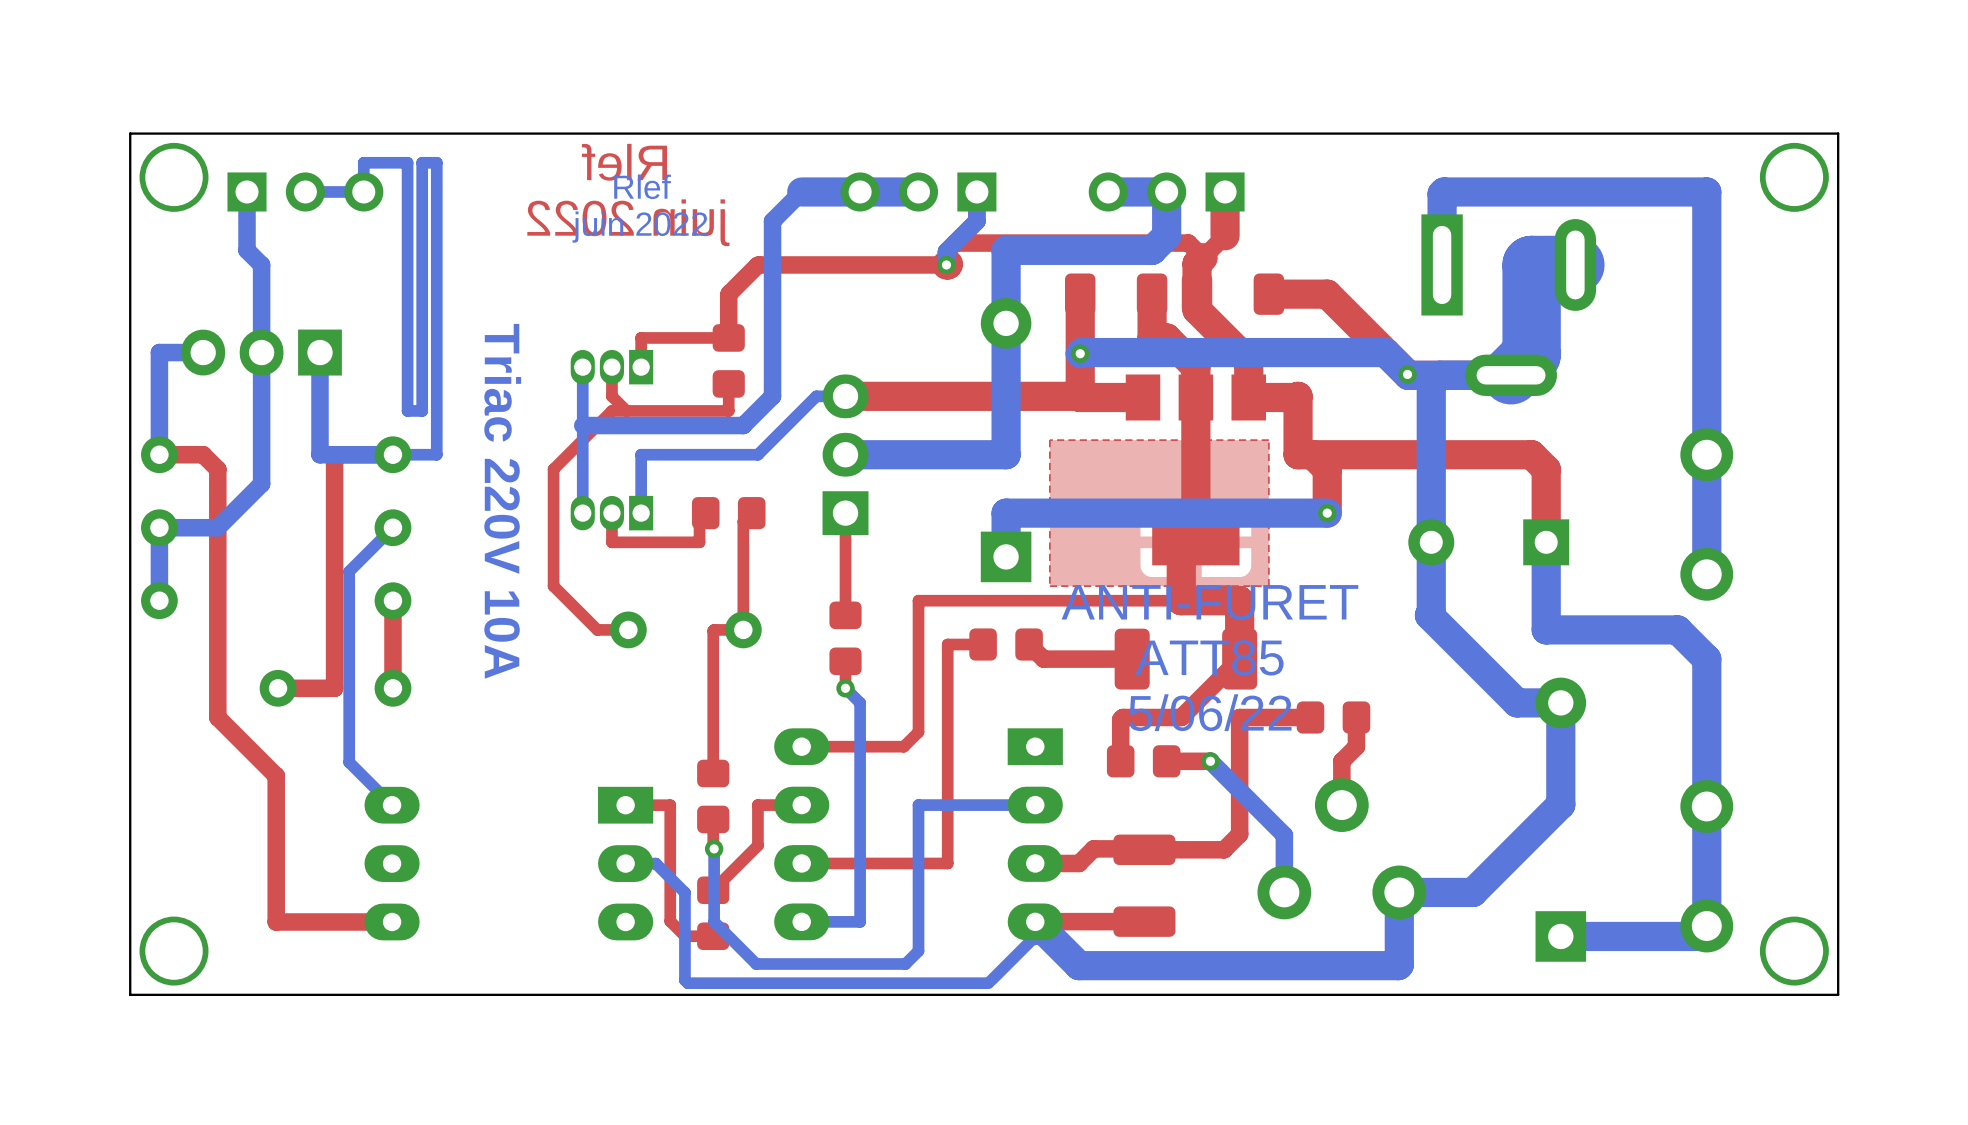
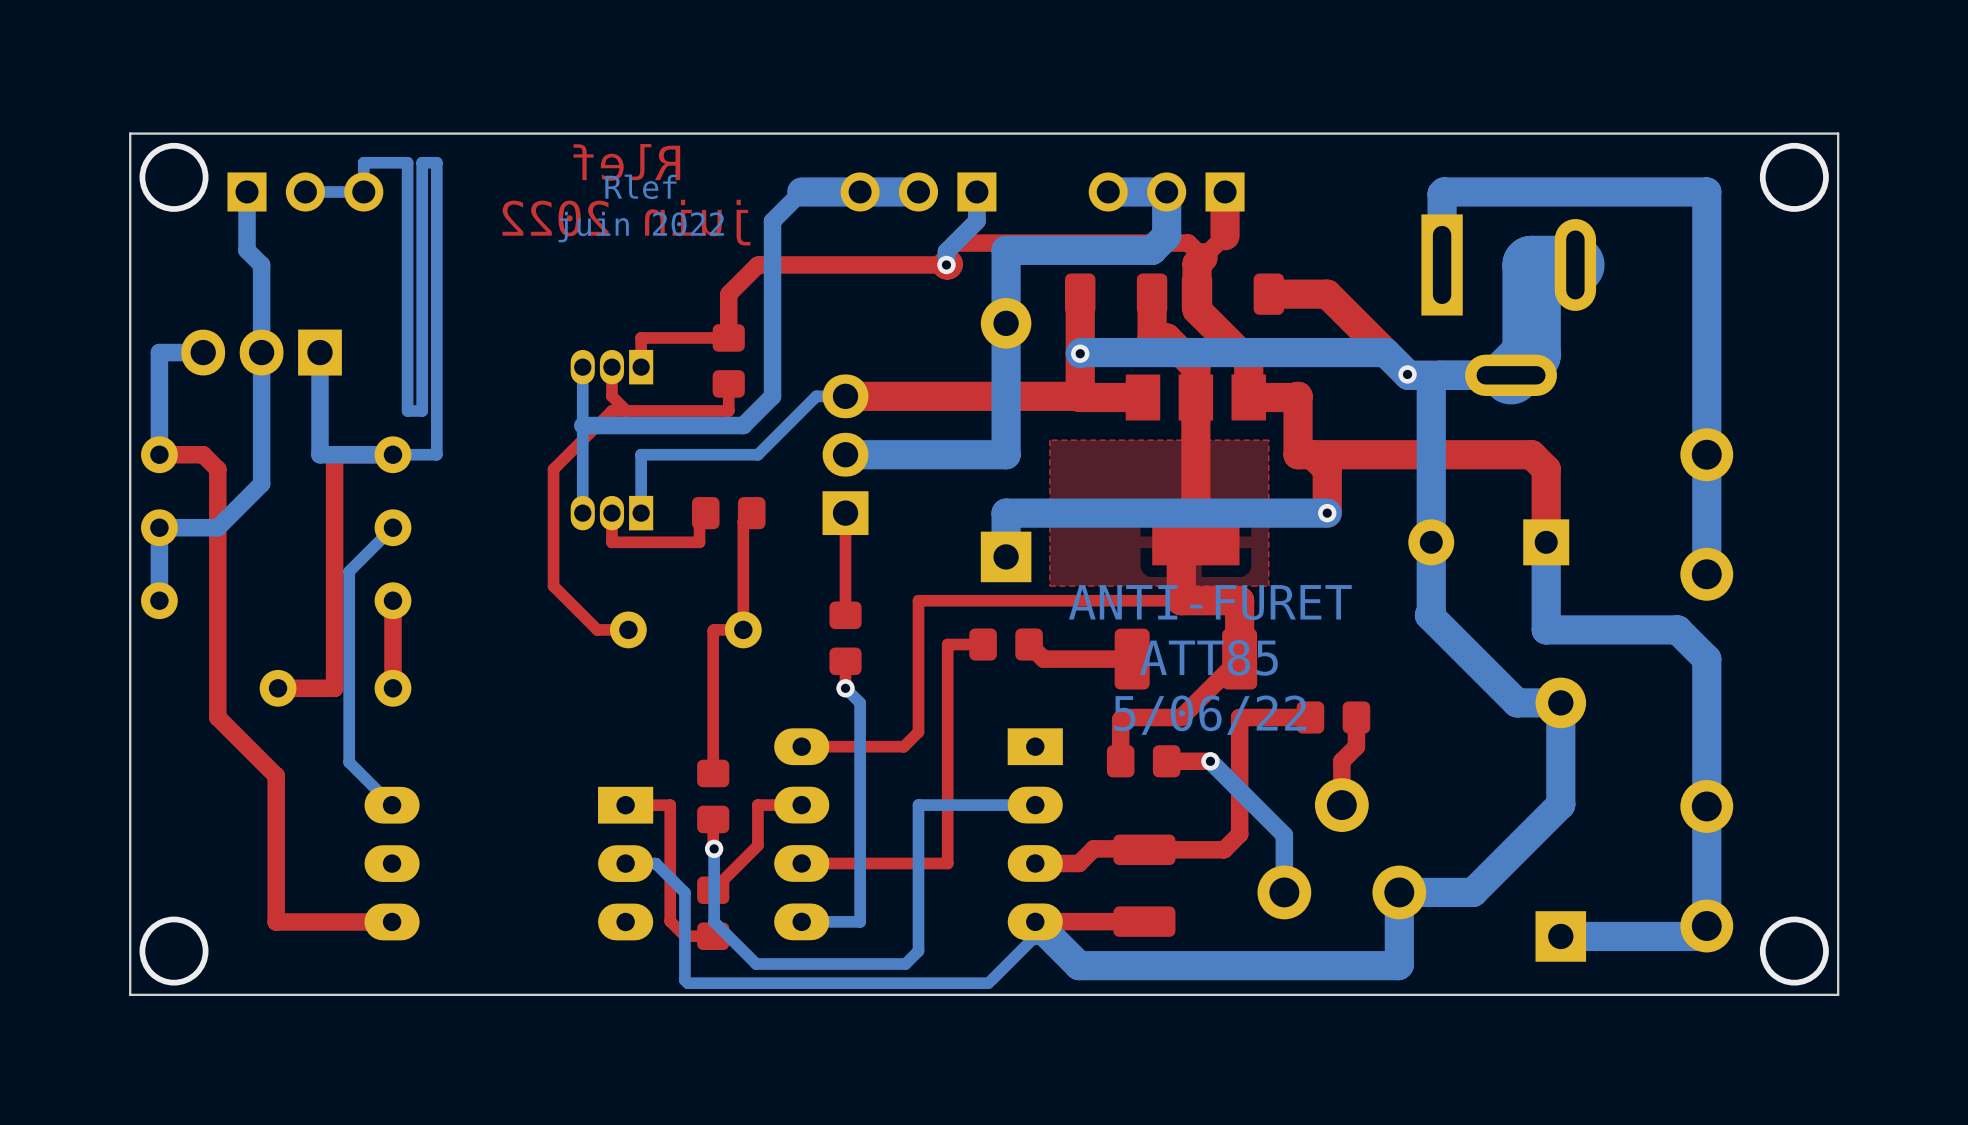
text: Triac 220V 10A (502, 501) -> none

